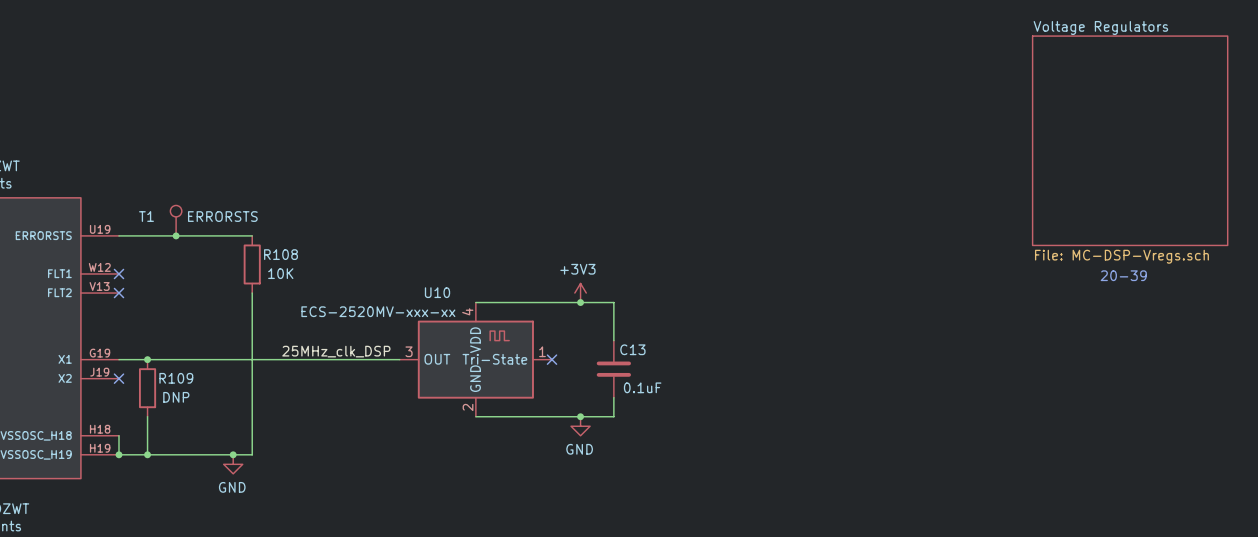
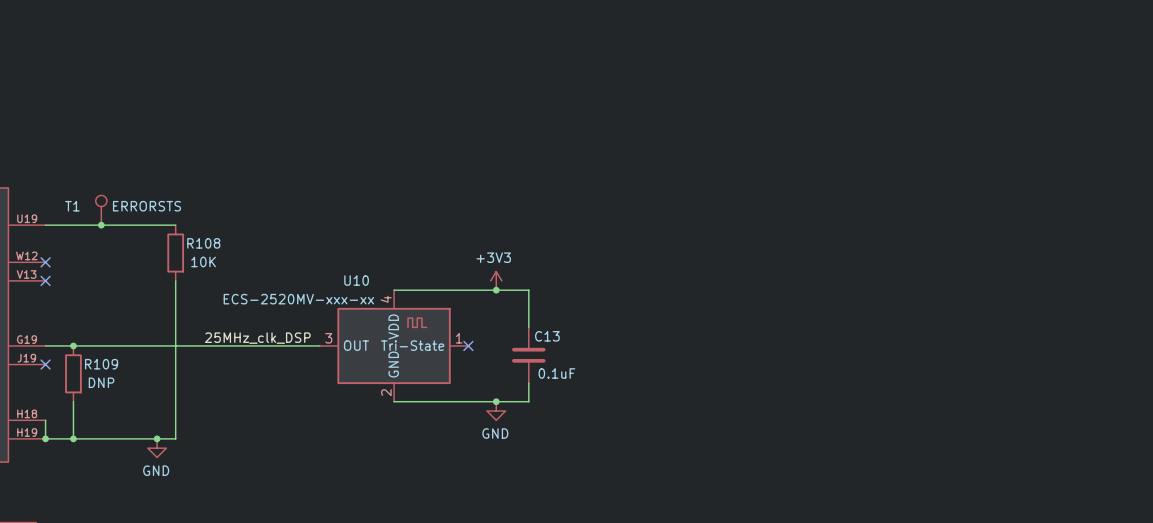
sheet Voltage Regulators: File: MC-DSP-Vregs.sch (1130, 140) -> none
text: 20-39 (1123, 275) -> none

